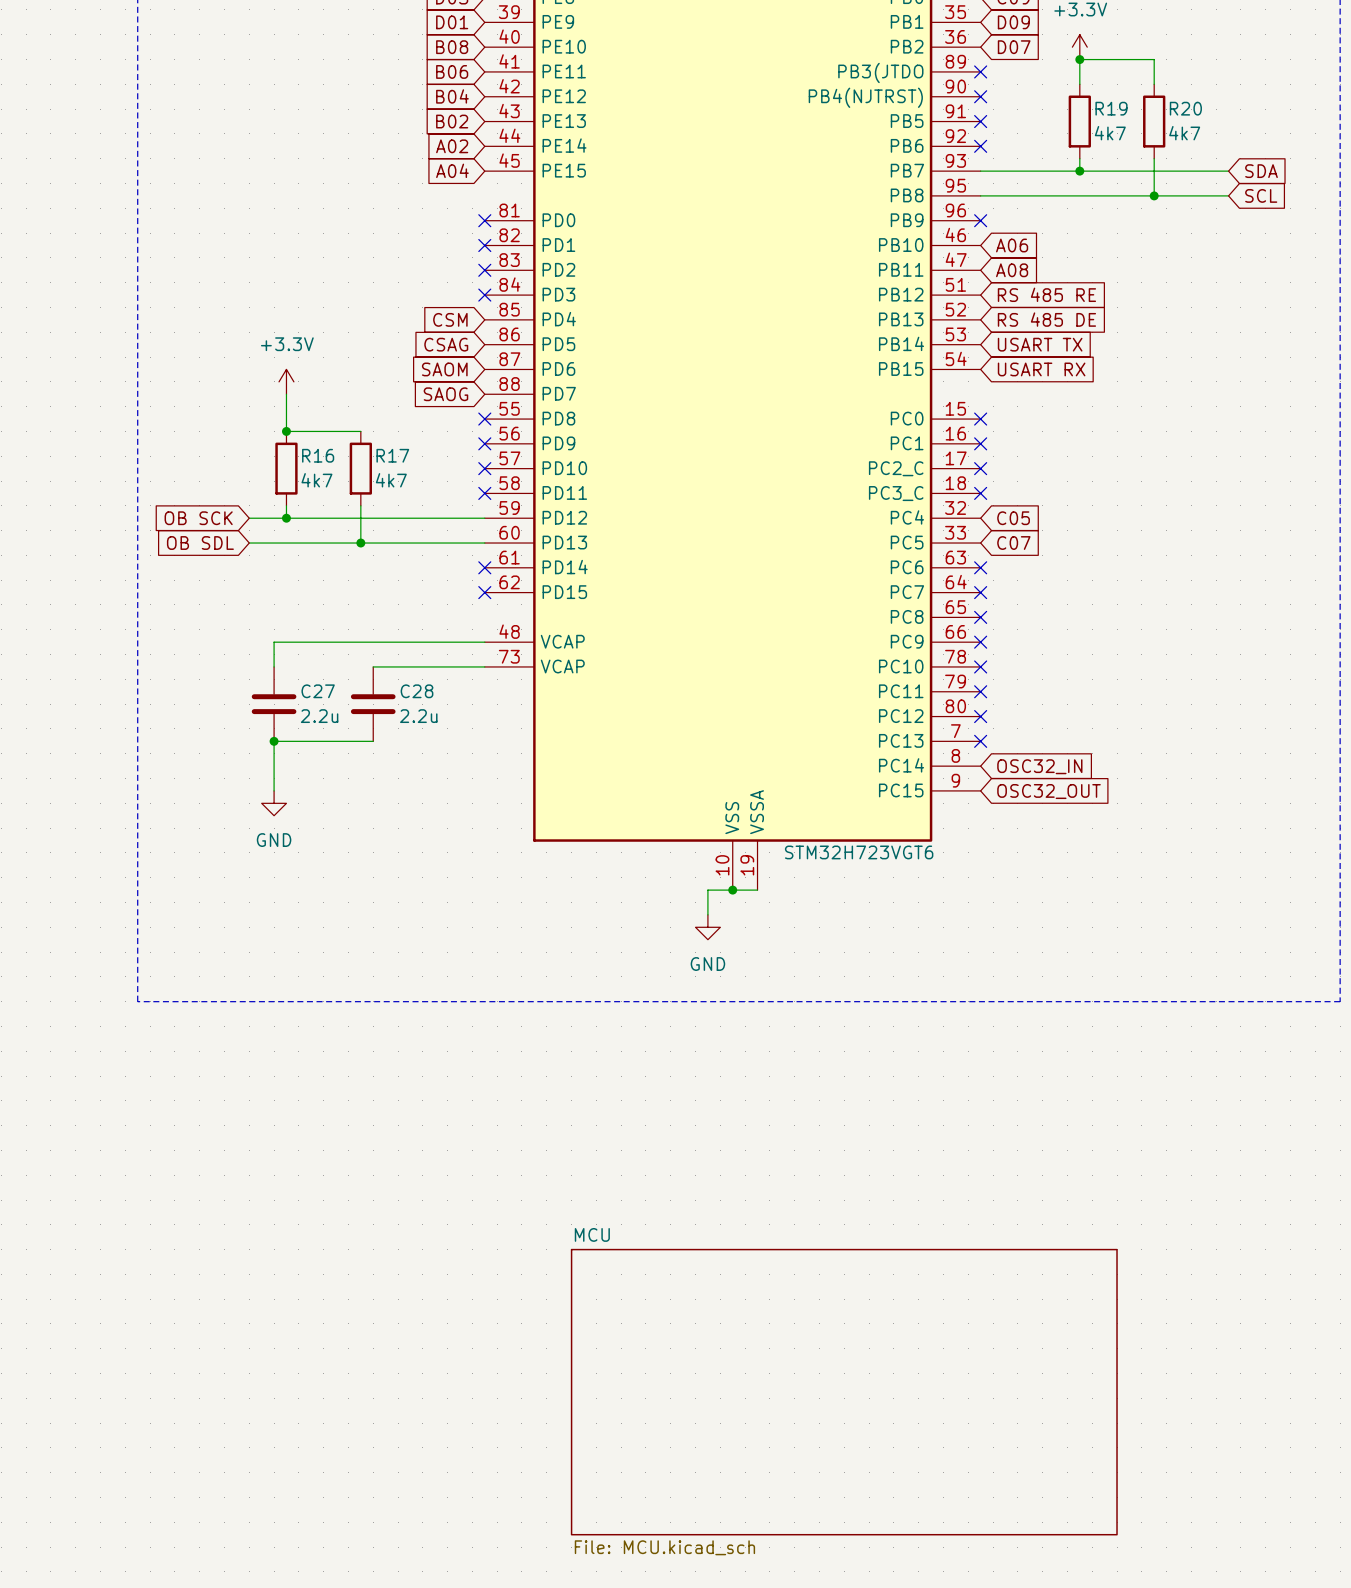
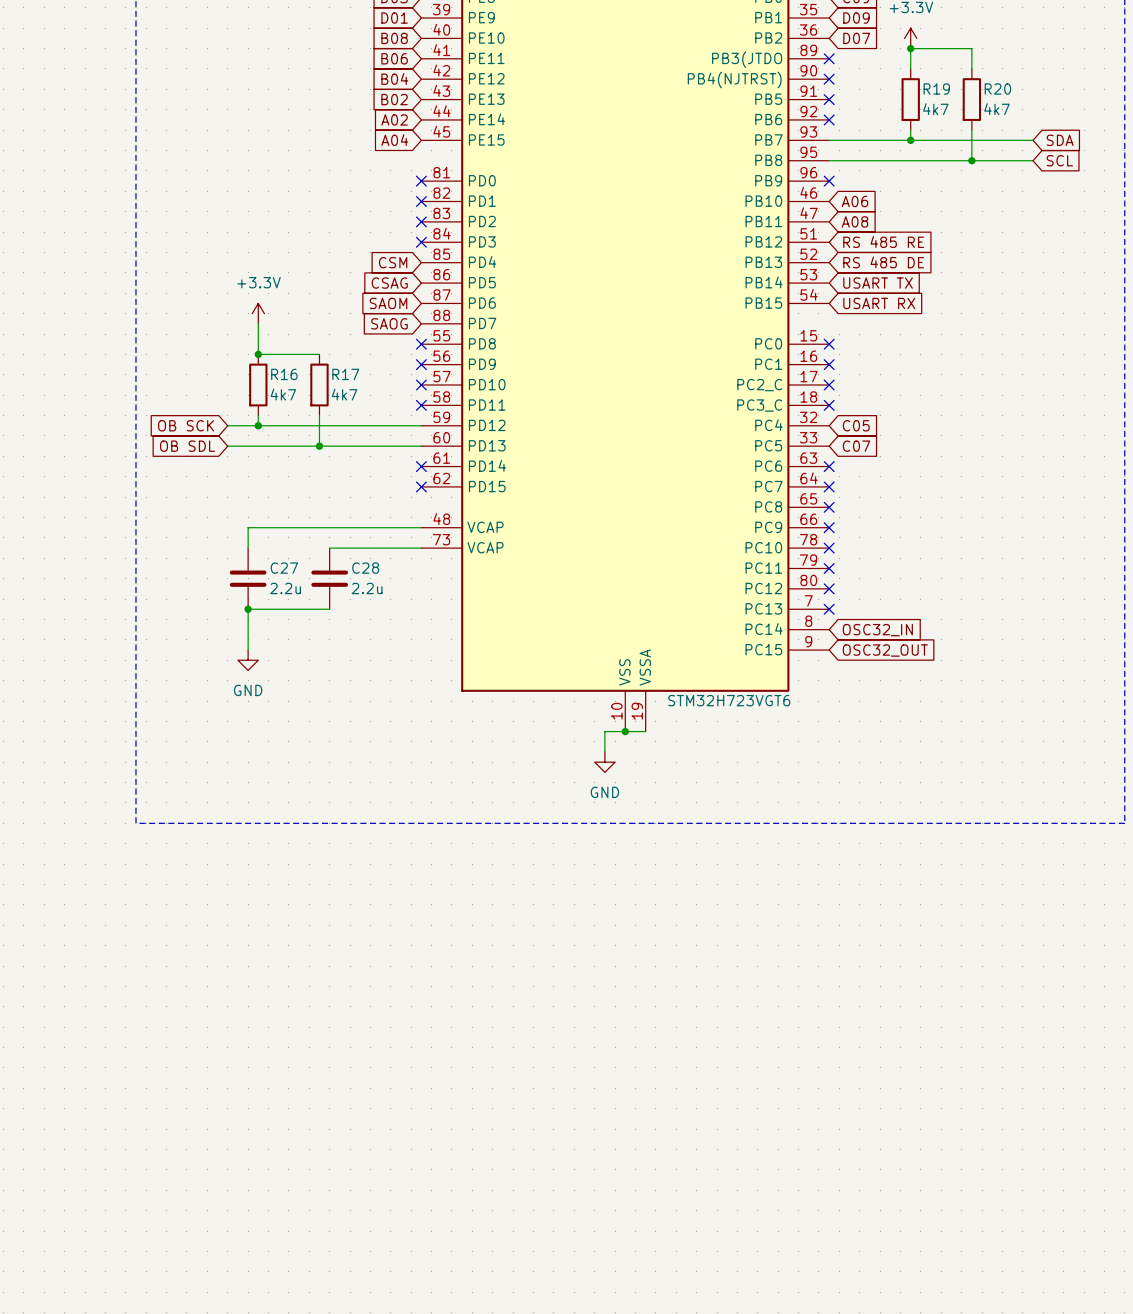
sheet MCU: File: MCU.kicad_sch (844, 1392) -> none

